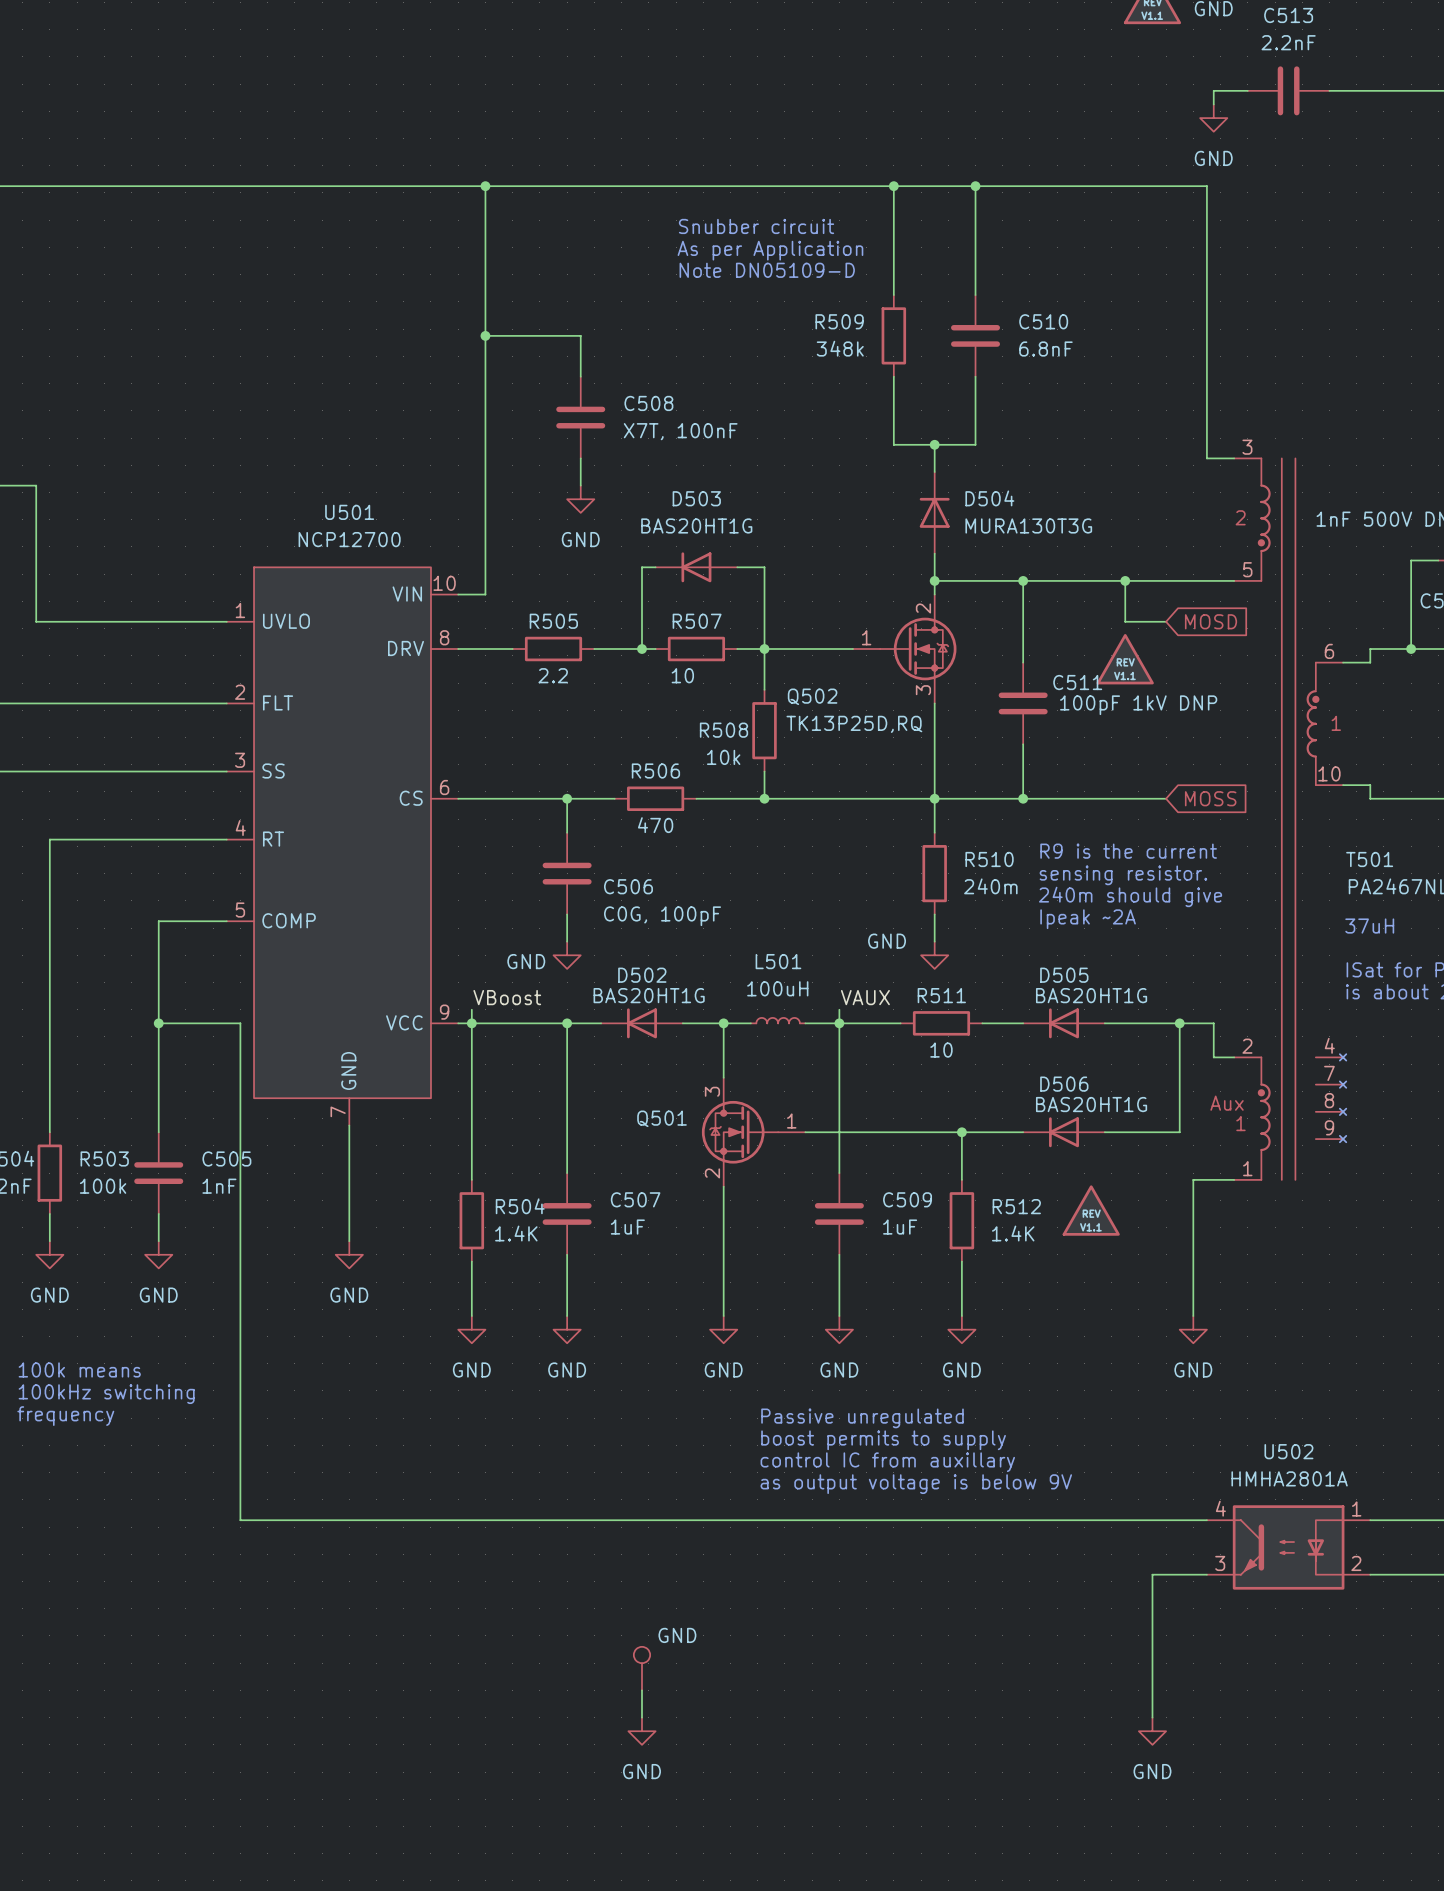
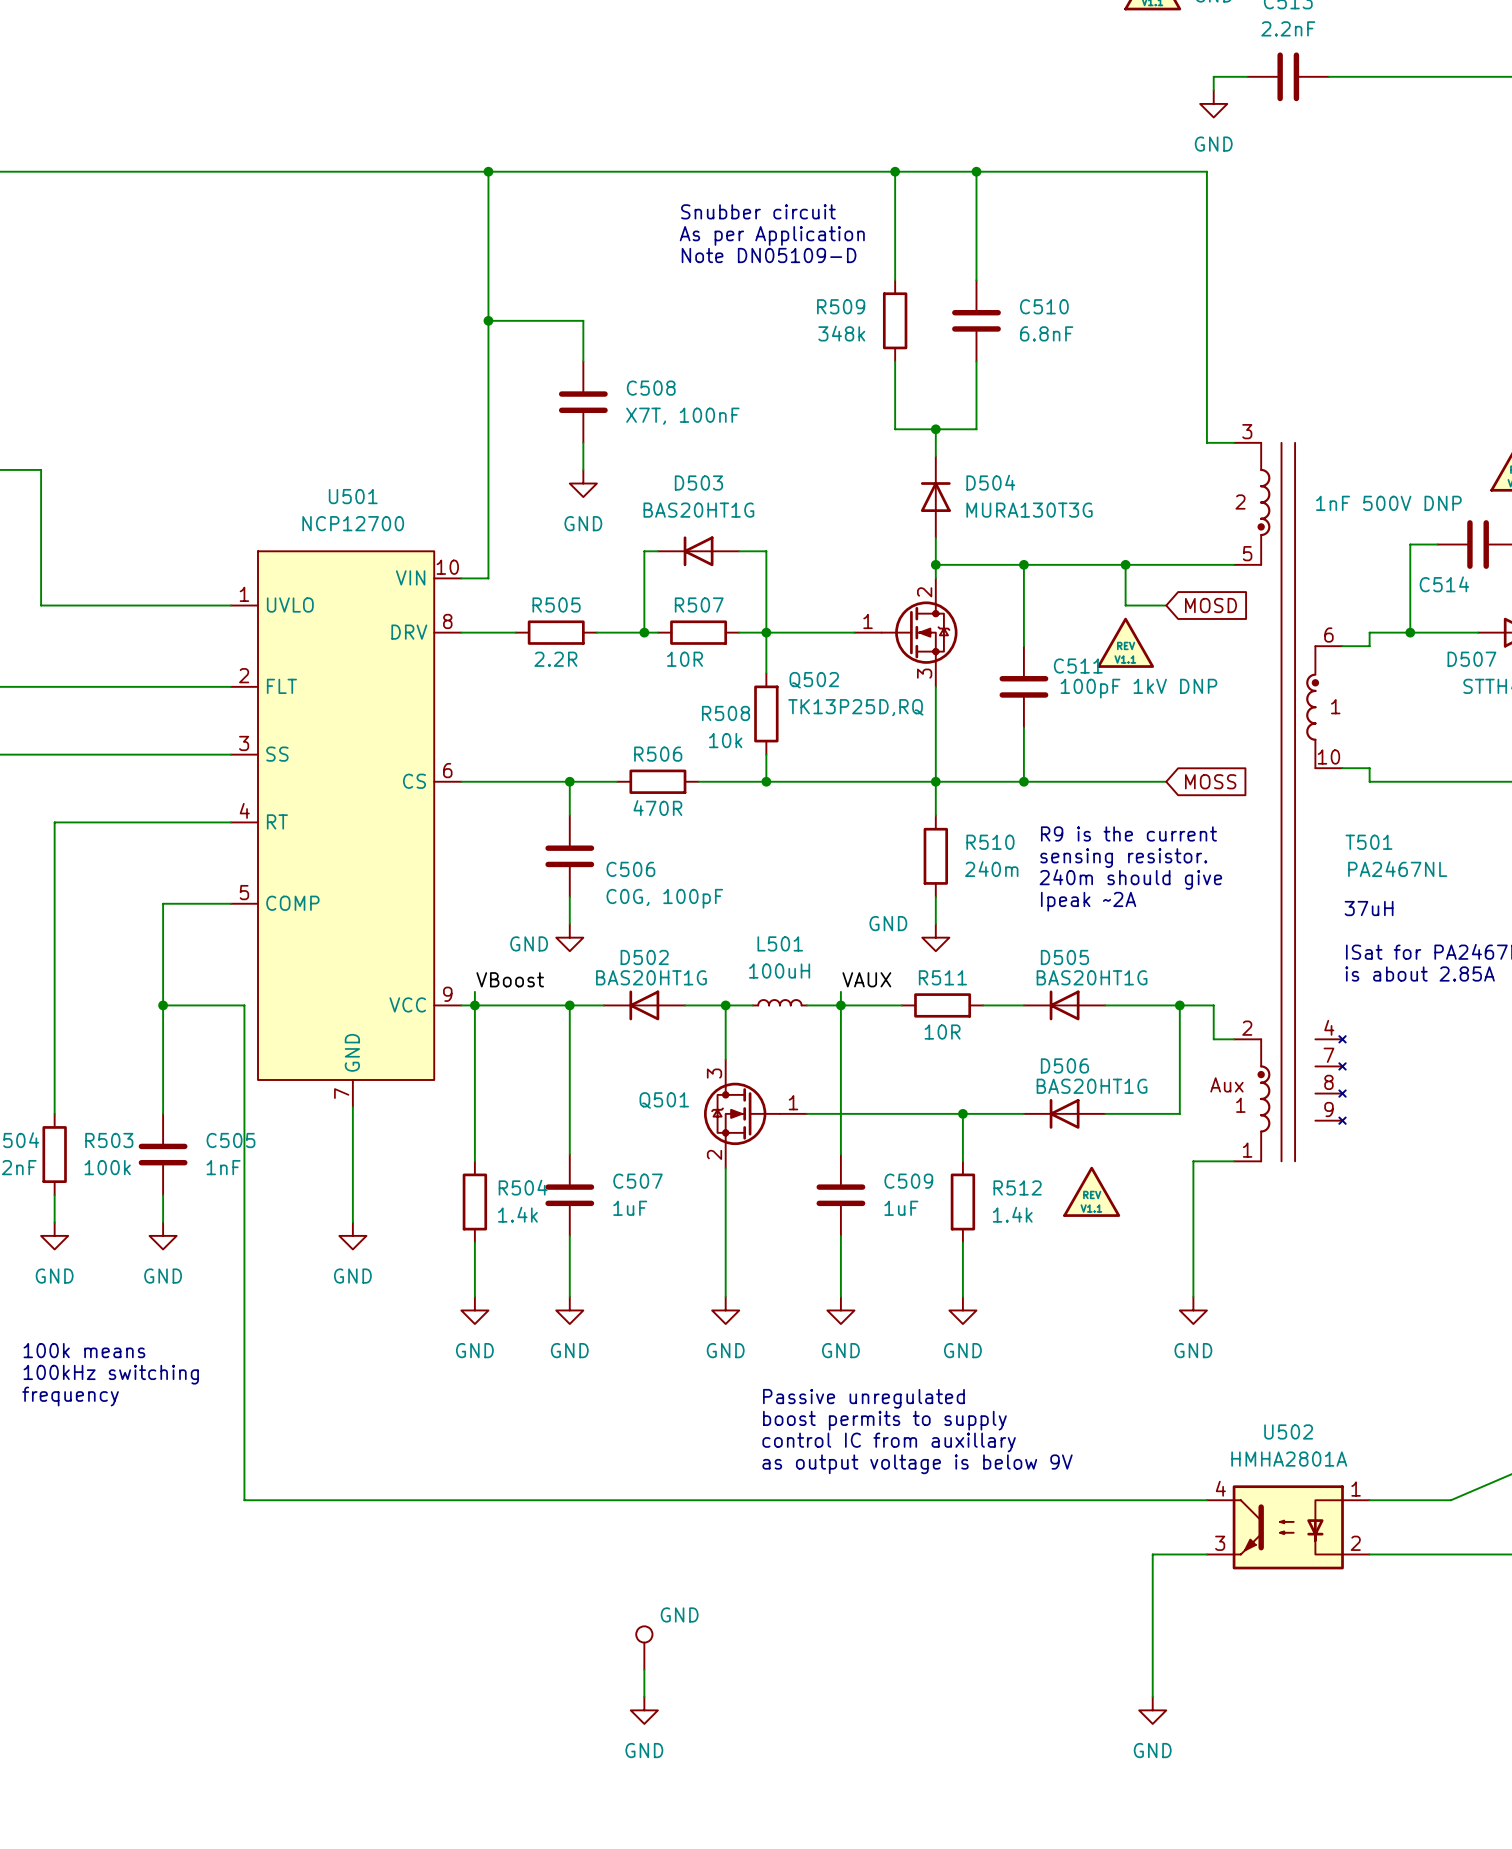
R505 value: 2.2 (553, 675) -> 2.2R (555, 659)
R507 value: 10 (682, 675) -> 10R (685, 659)
R506 value: 470 (655, 825) -> 470R (657, 808)
R511 value: 10 (941, 1050) -> 10R (942, 1032)
R504 value: 1.4K (516, 1233) -> 1.4k (517, 1214)
R512 value: 1.4K (1013, 1233) -> 1.4k (1012, 1214)

